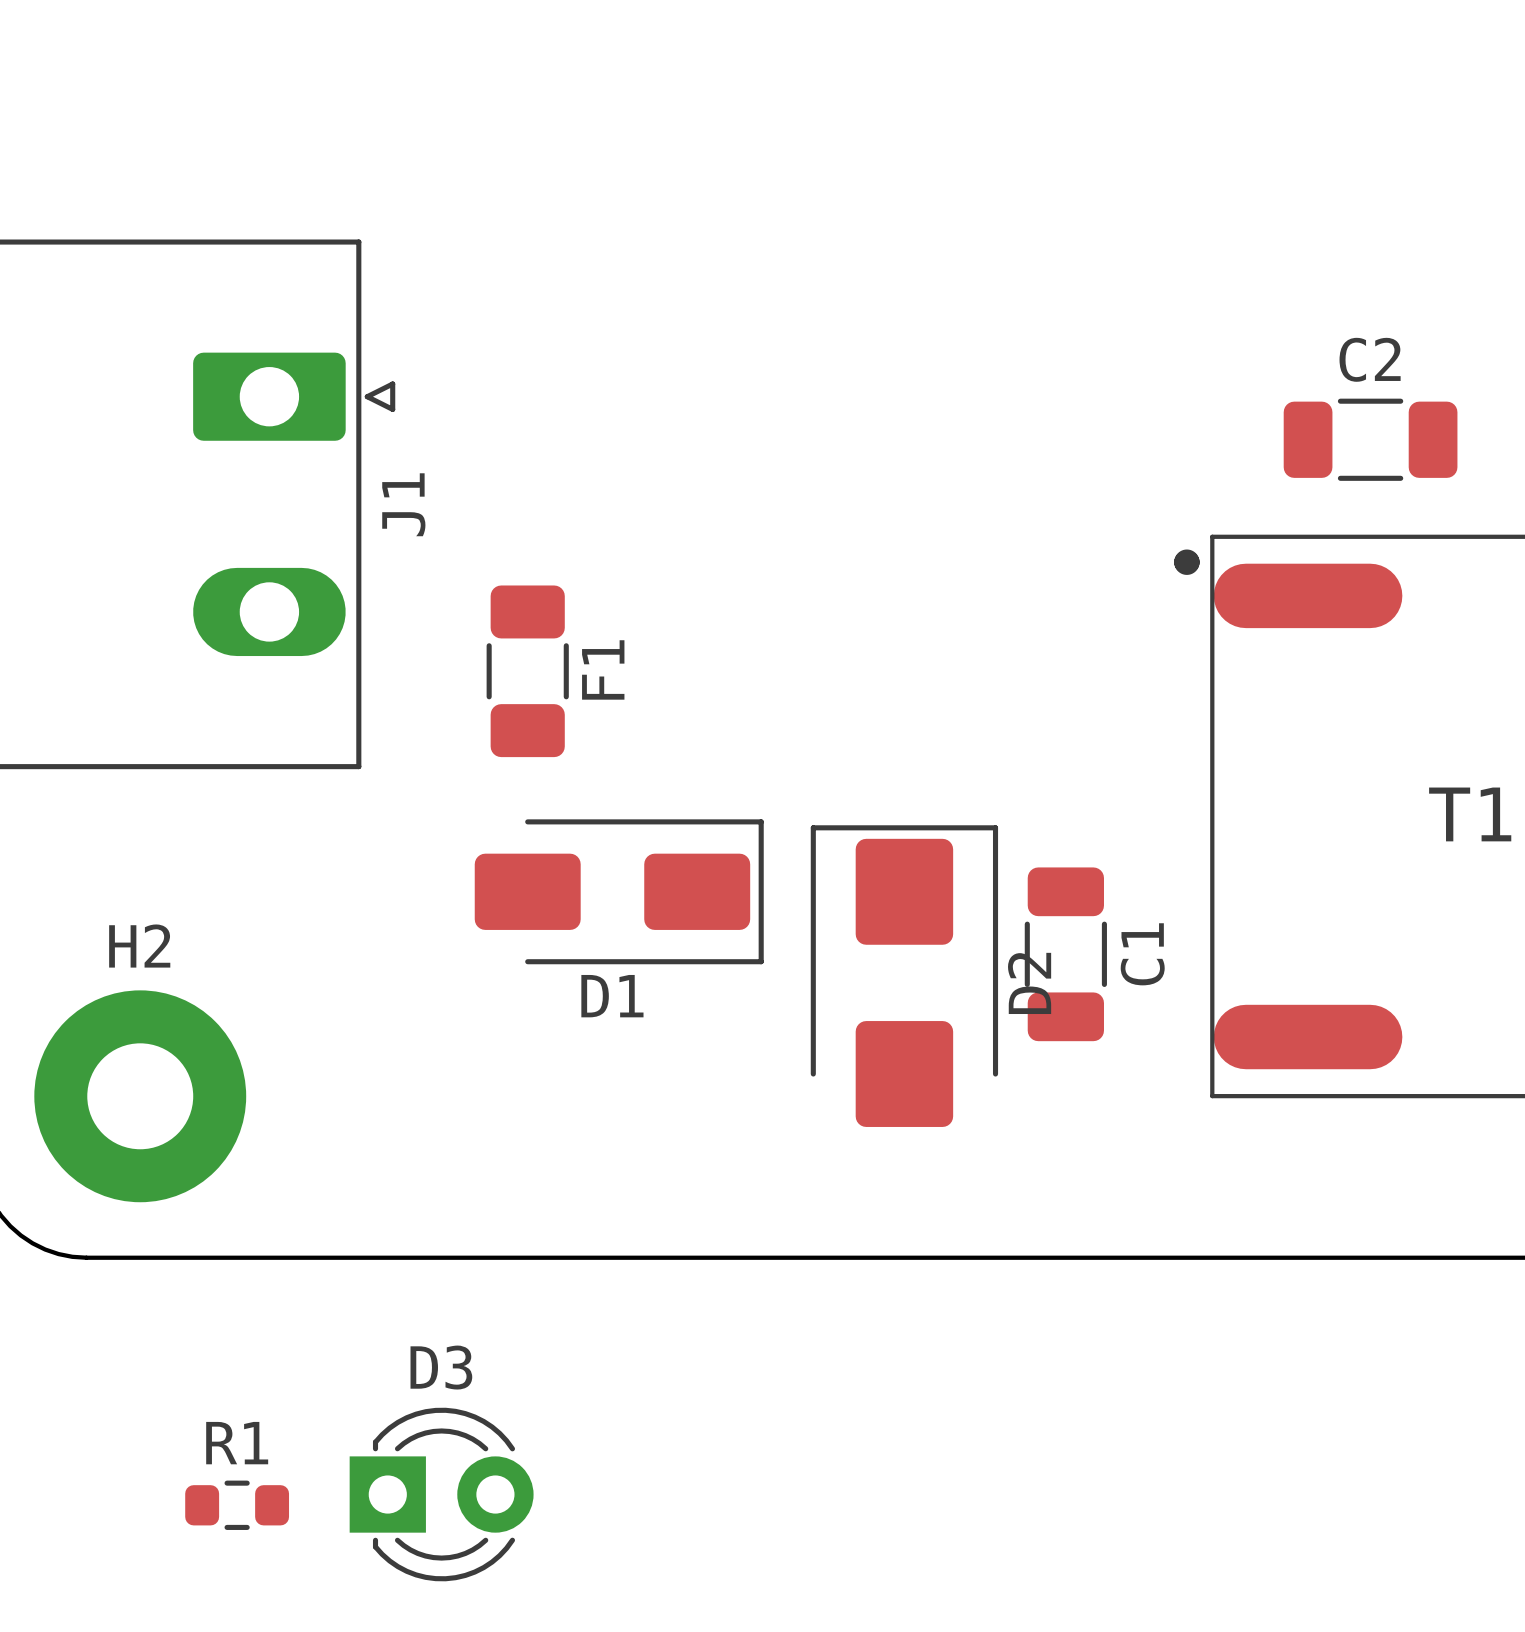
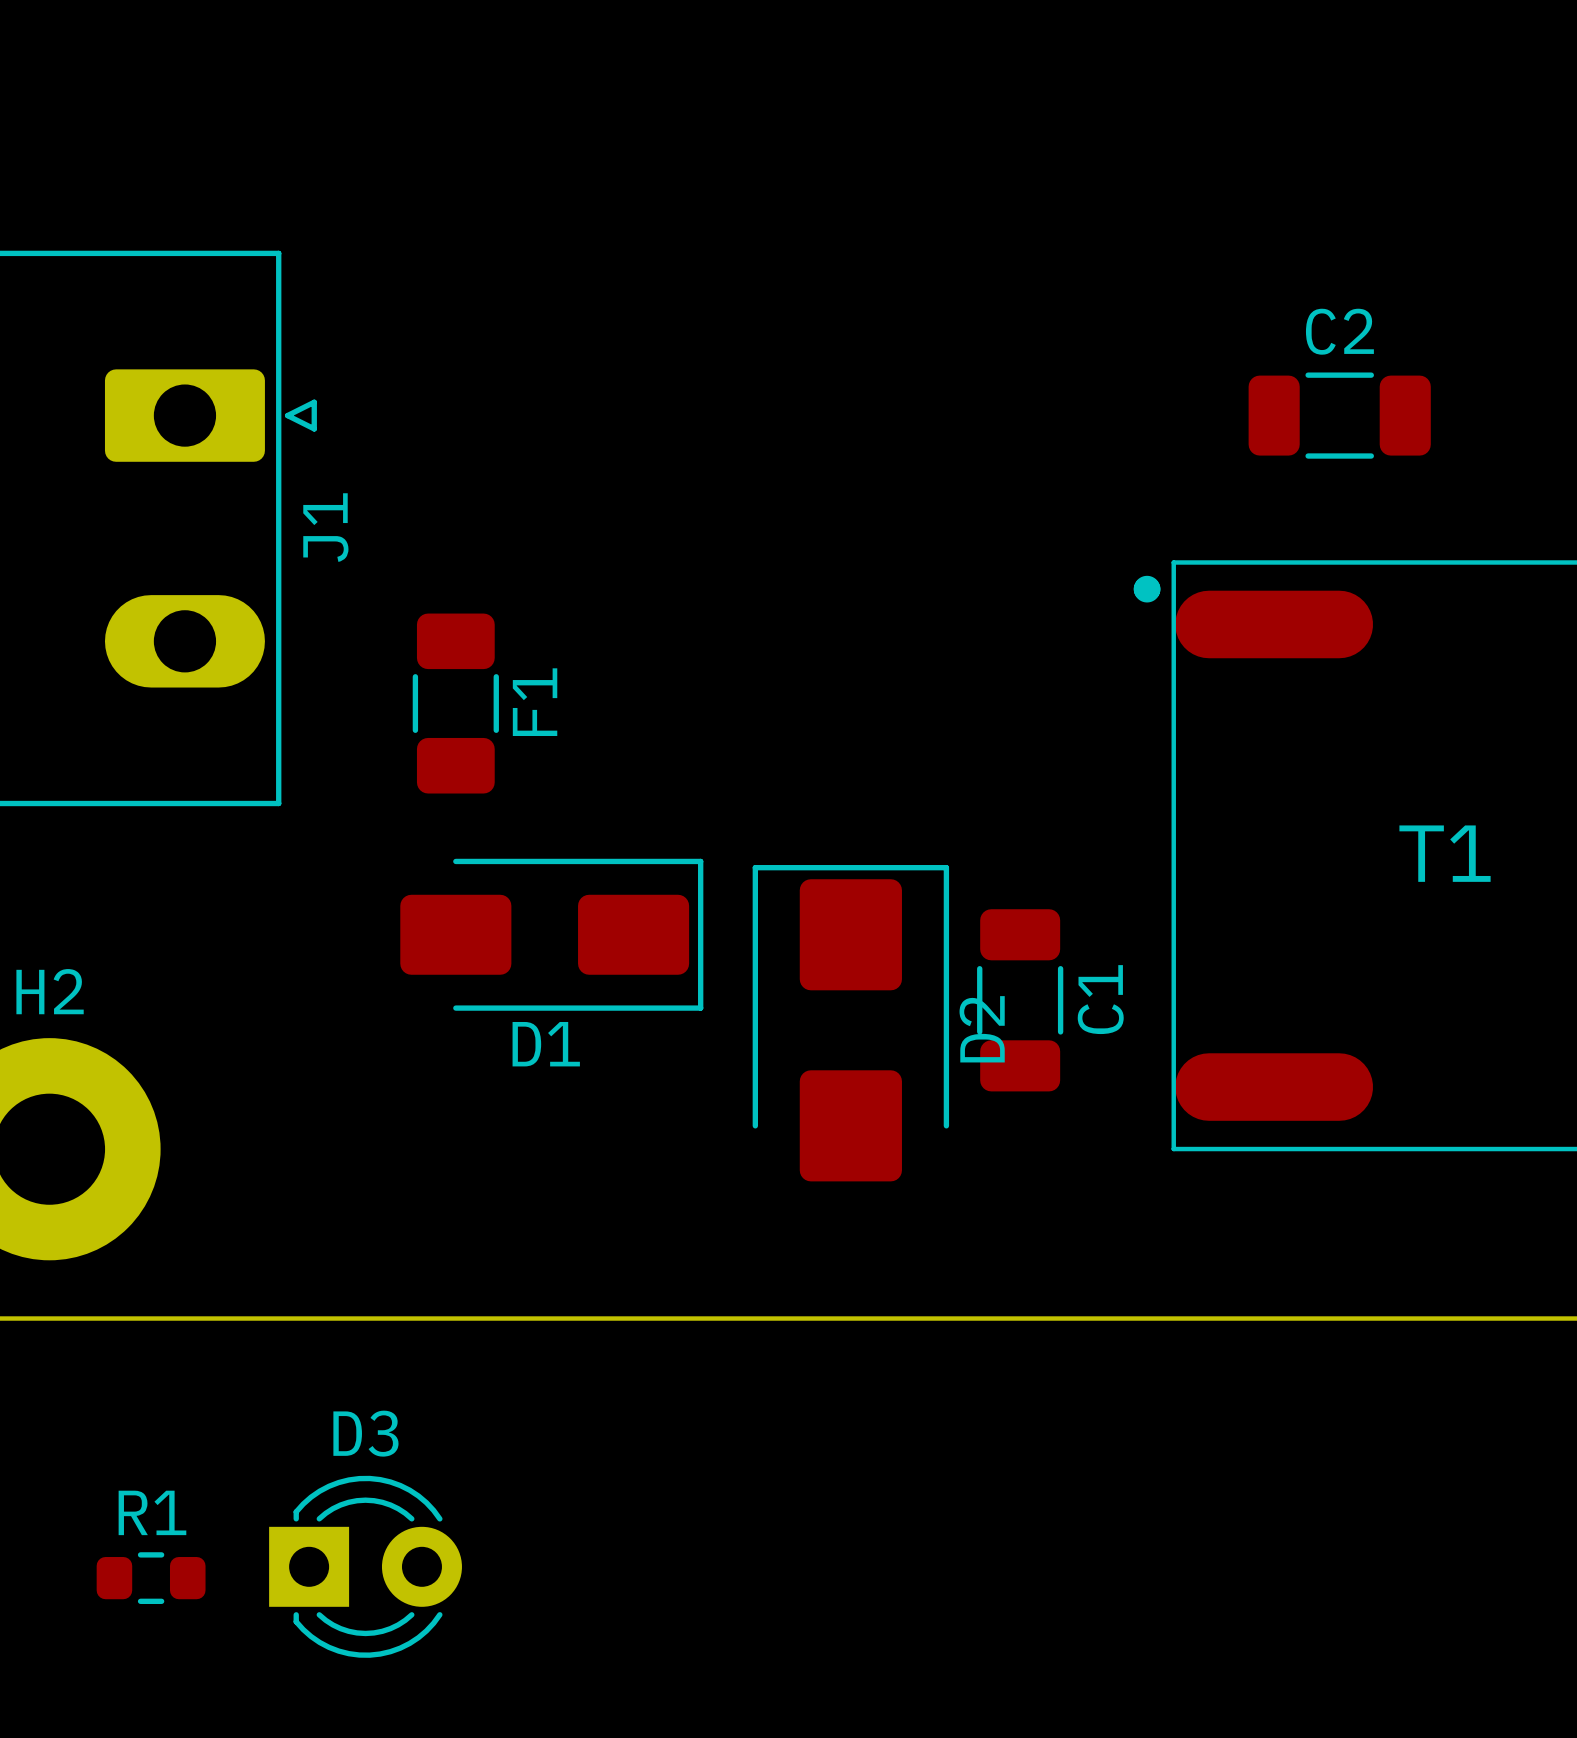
C2 position: (1370, 439) -> (1339, 415)

